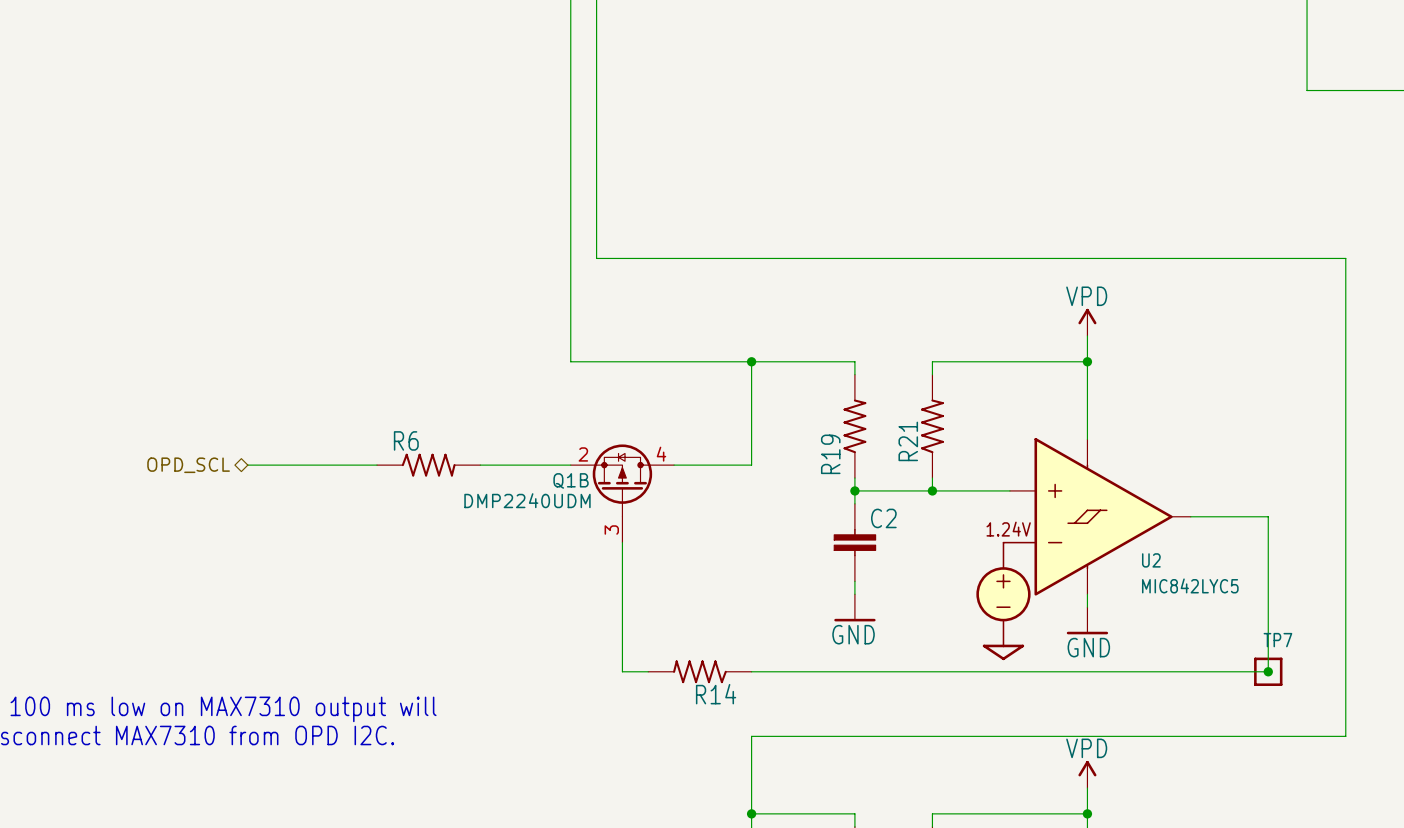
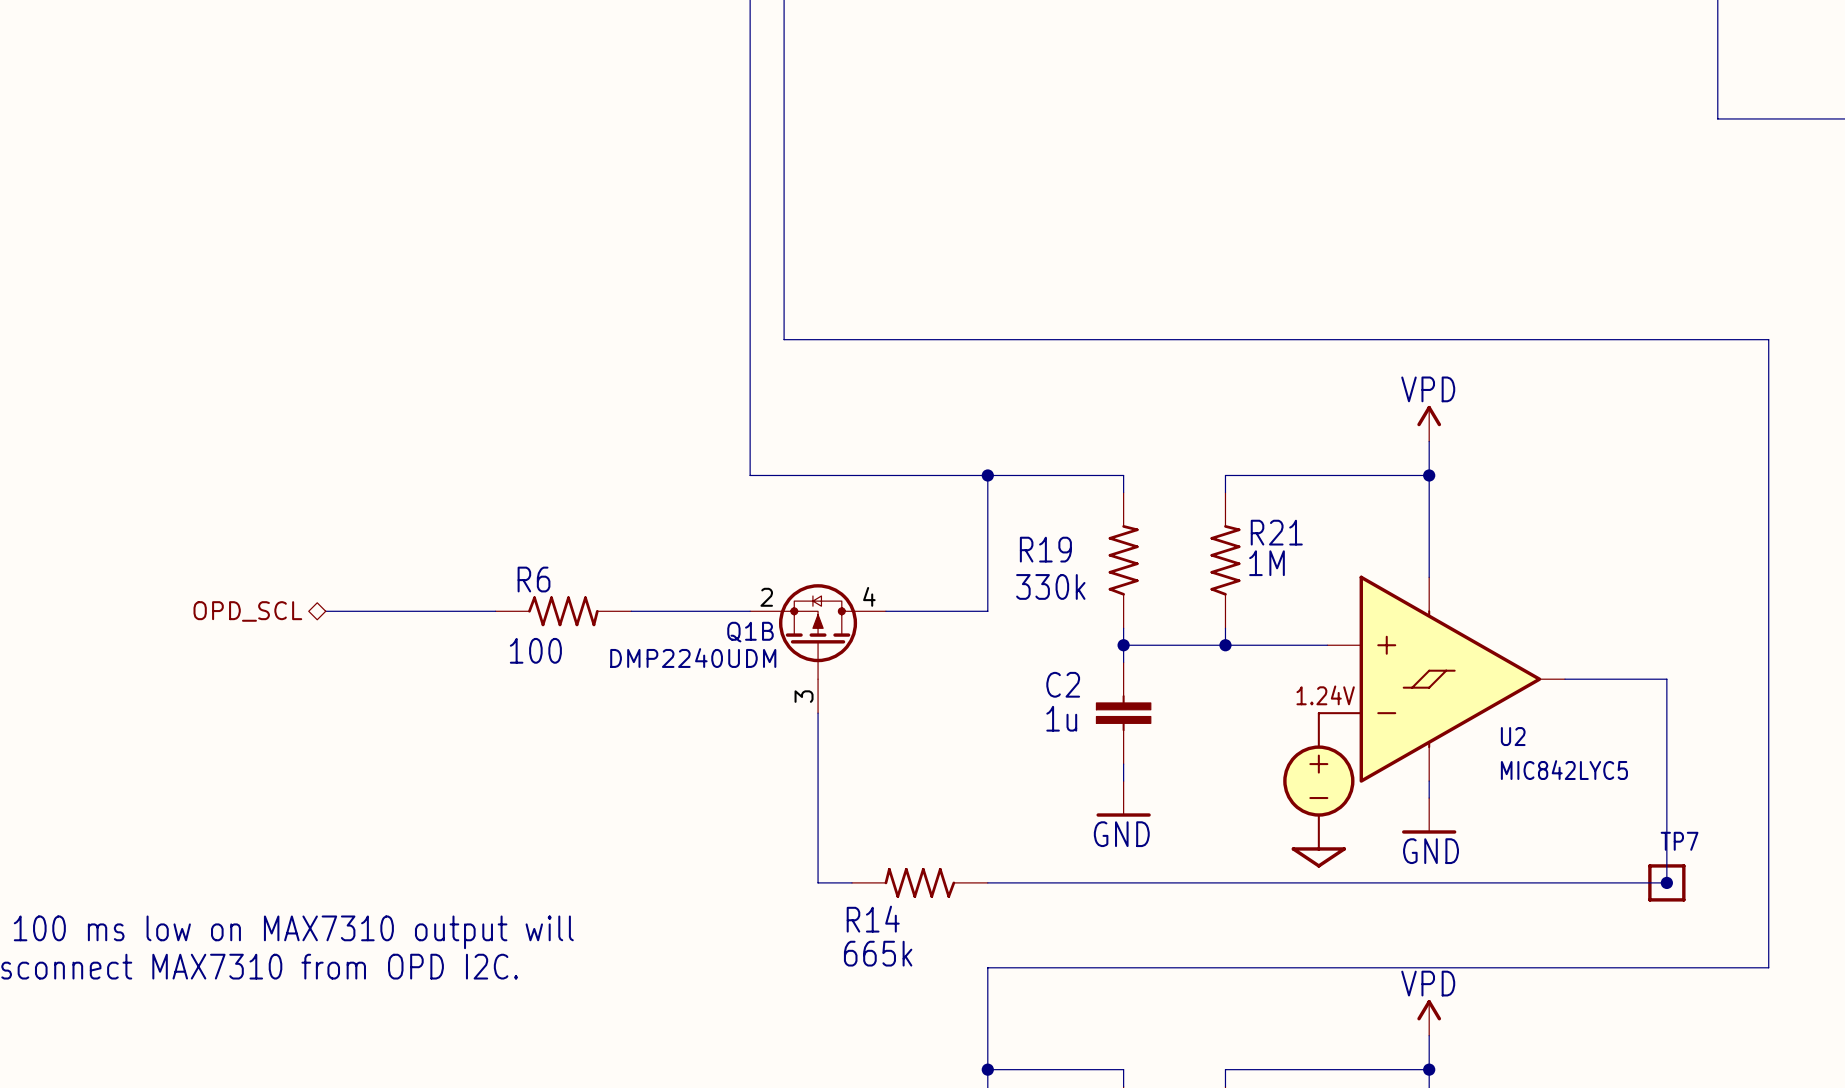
R21 value: none -> 1M (1267, 563)
R21 name rotation: 0° (908, 441) -> 90° clockwise (1276, 532)
R21 name position: R21 (908, 441) -> R21 (1276, 532)
R19 value: none -> 330k (1050, 586)
R19 name rotation: 0° (830, 454) -> 90° clockwise (1045, 549)
R6 value: none -> 100 (535, 650)
C2 name position: C2 (883, 518) -> C2 (1063, 684)
C2 value: none -> 1u (1061, 718)
R14 name position: R14 (716, 694) -> R14 (873, 919)
R14 value: none -> 665k (878, 953)

